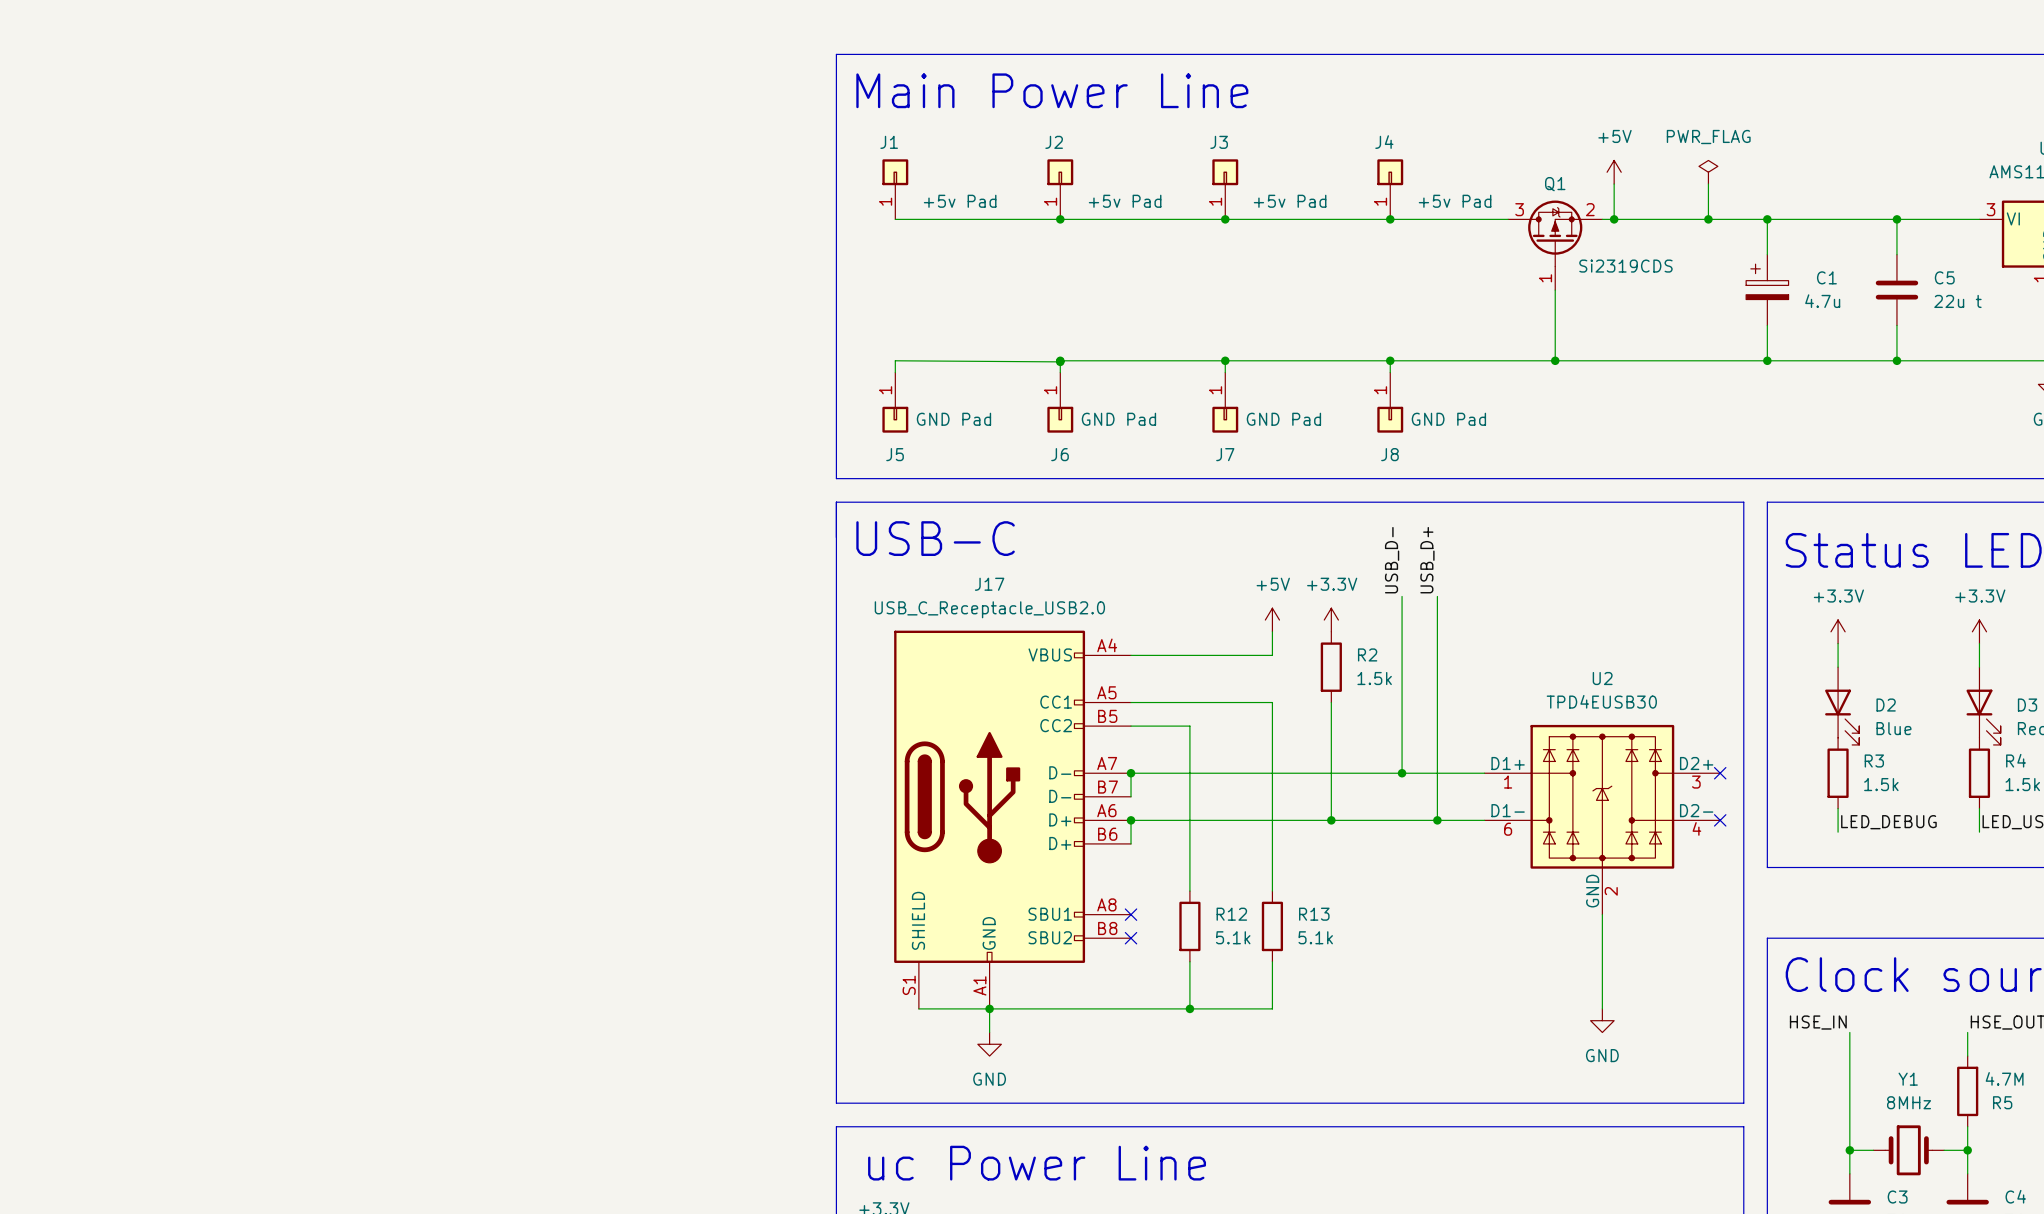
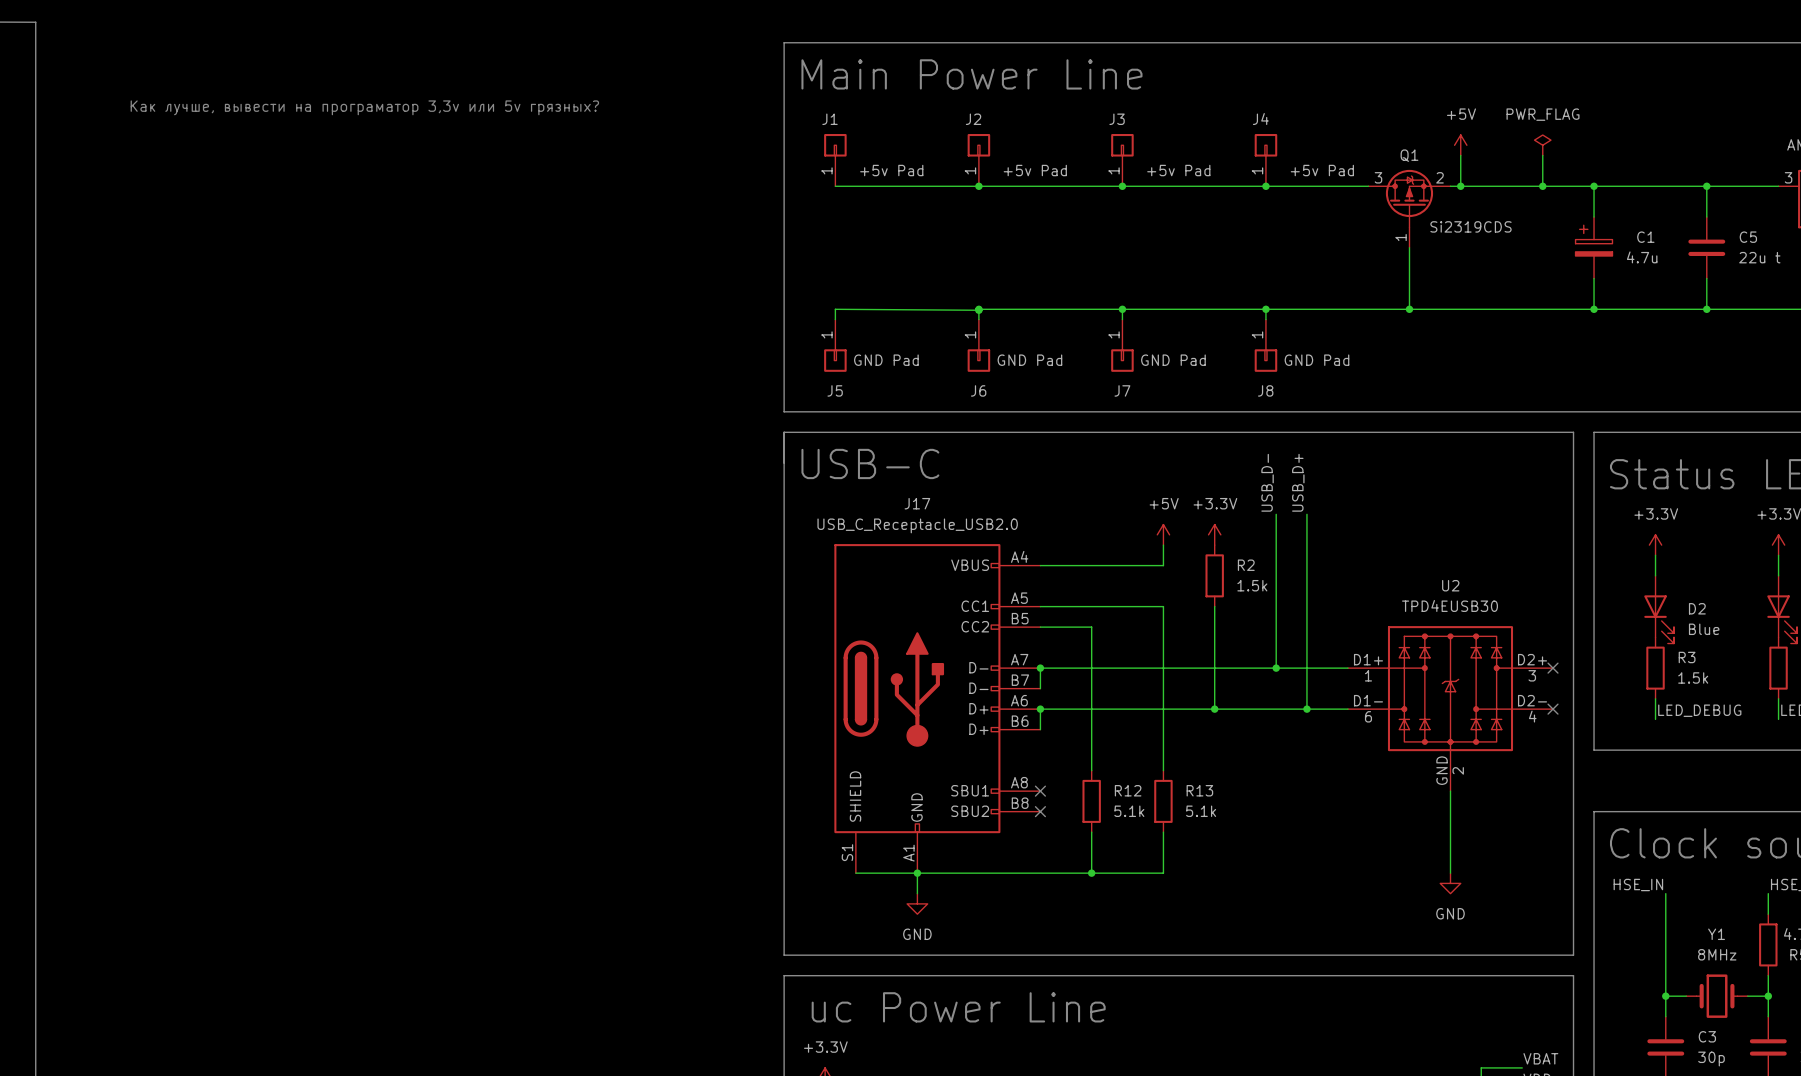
text: none -> Как лучше, вывести на програматор 3,3v или 5v грязных? (364, 107)

